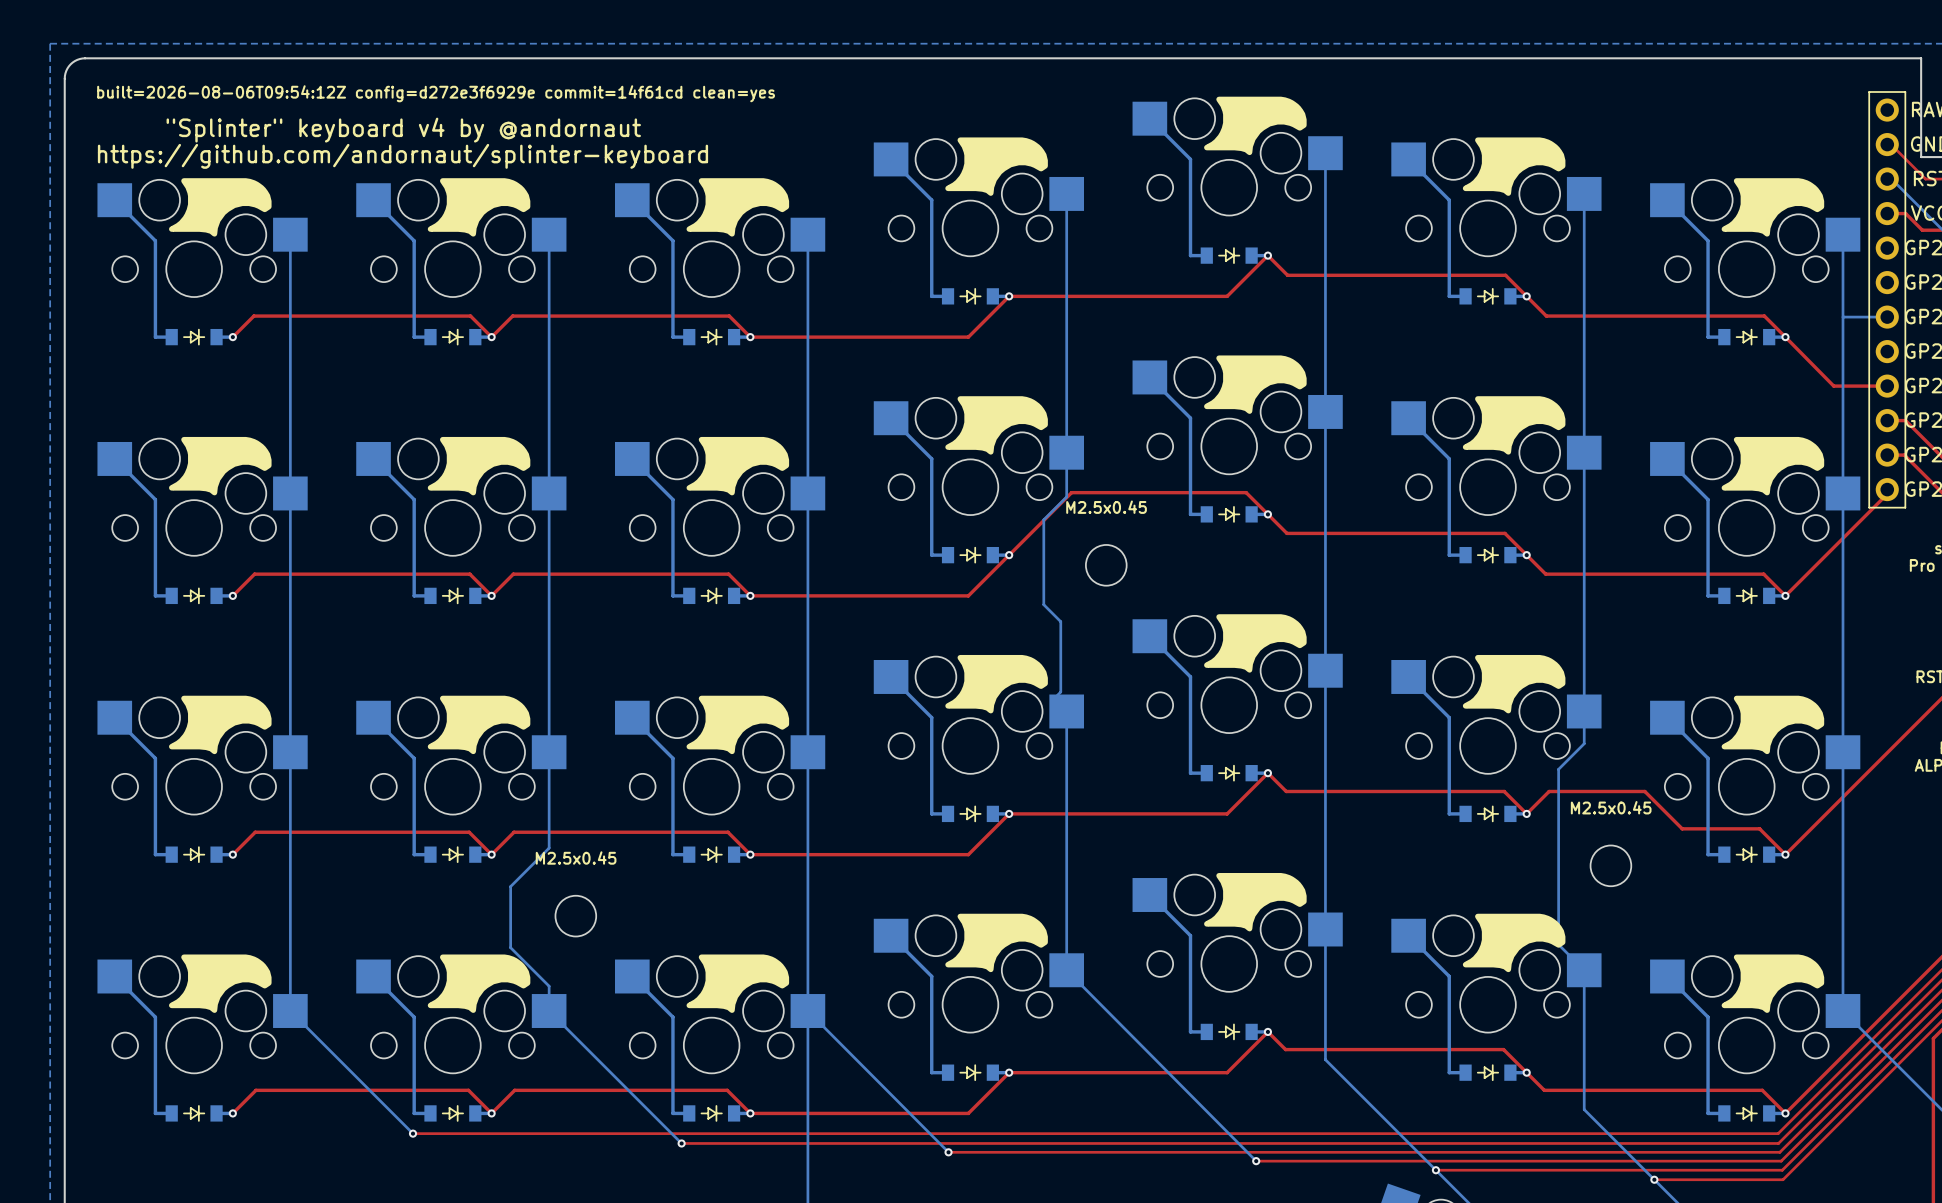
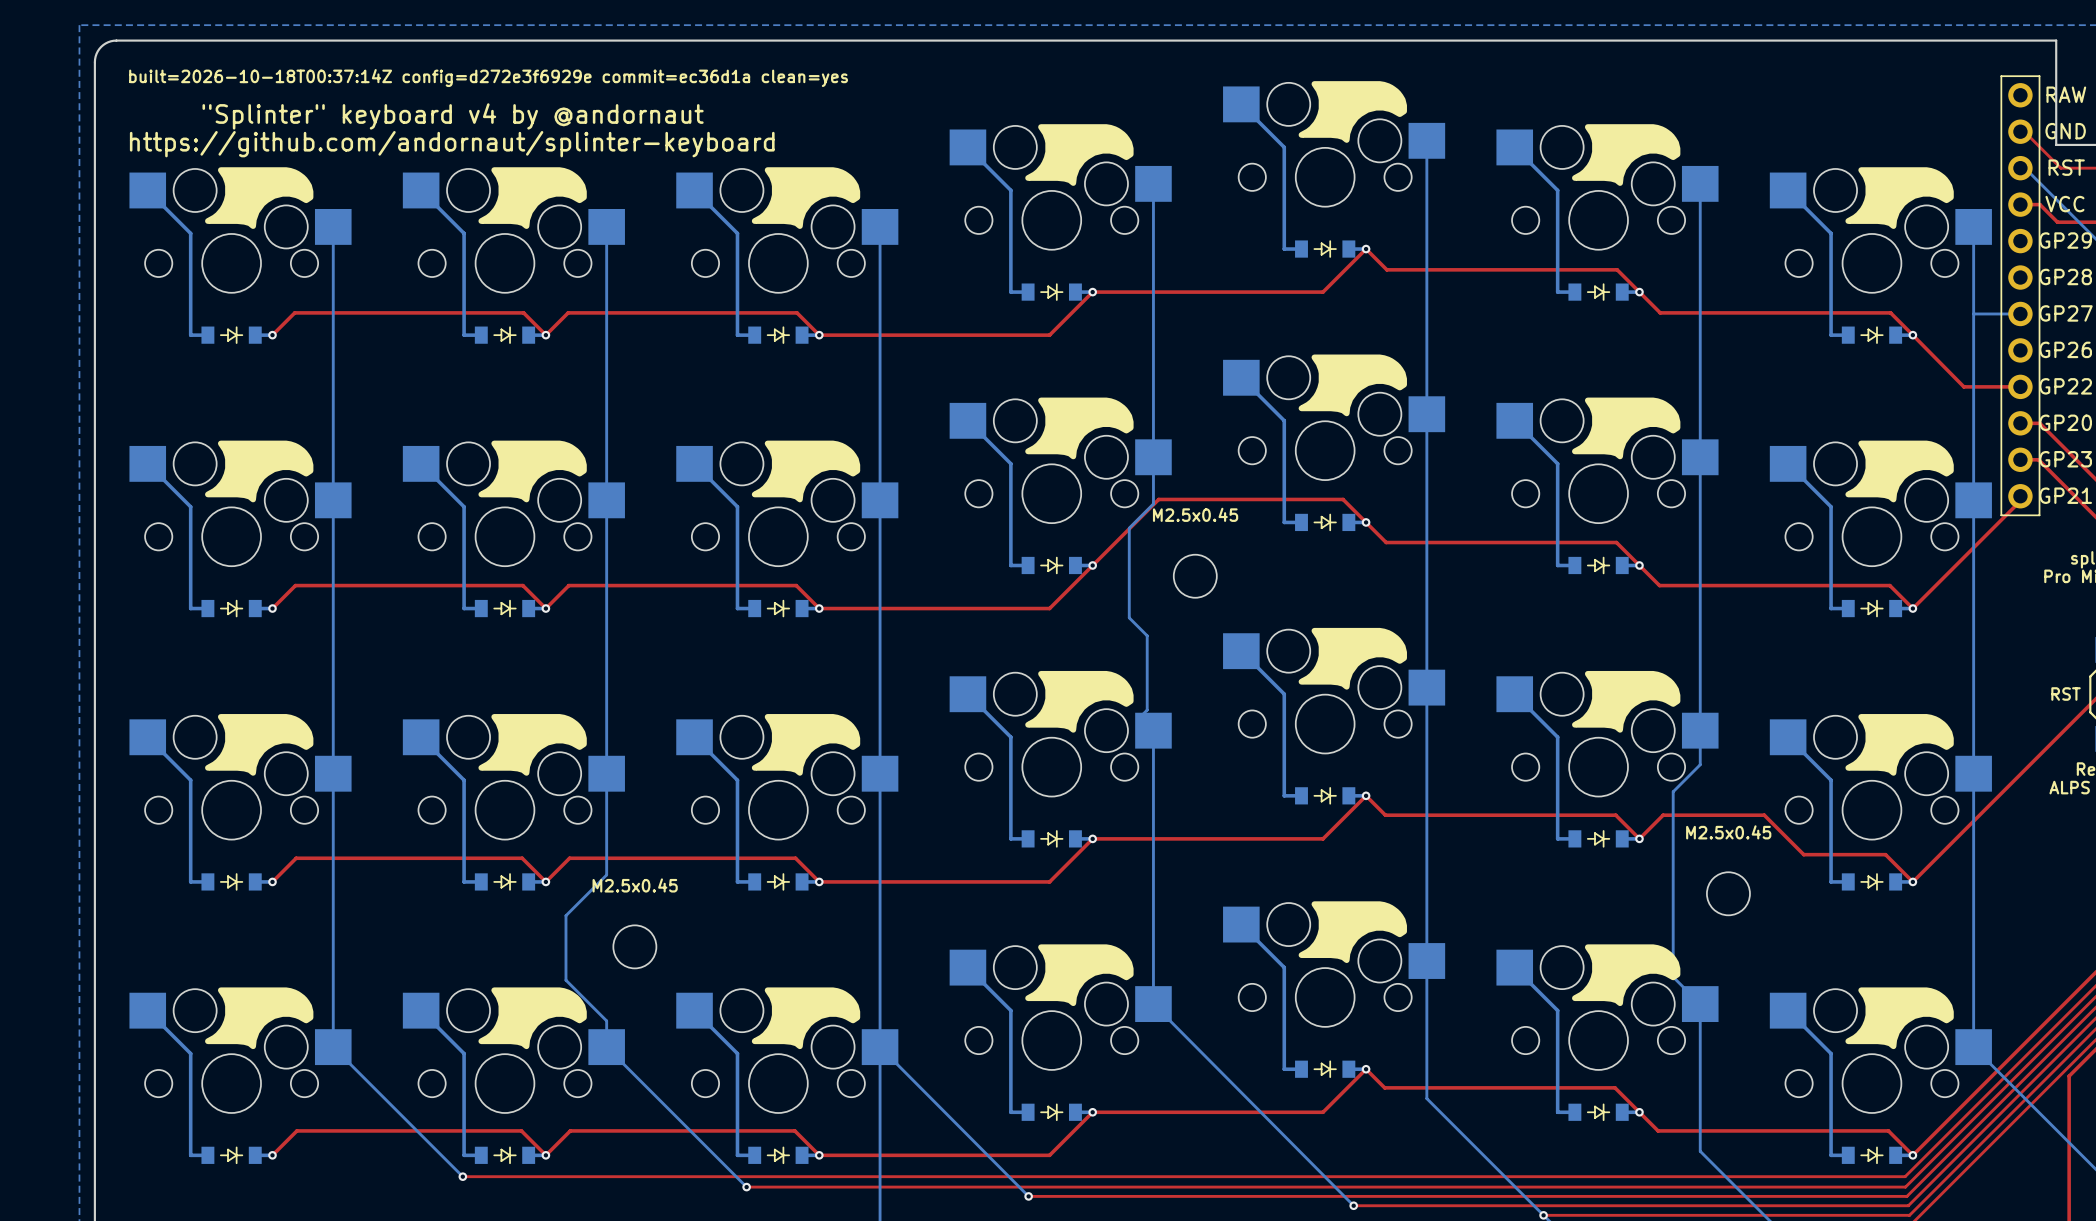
text: built=2026-08-06T09:54:12Z config=d272e3f6929e commit=14f61cd clean=yes (436, 93) -> built=2026-10-18T00:37:14Z config=d272e3f6929e commit=ec36d1a clean=yes (488, 78)

